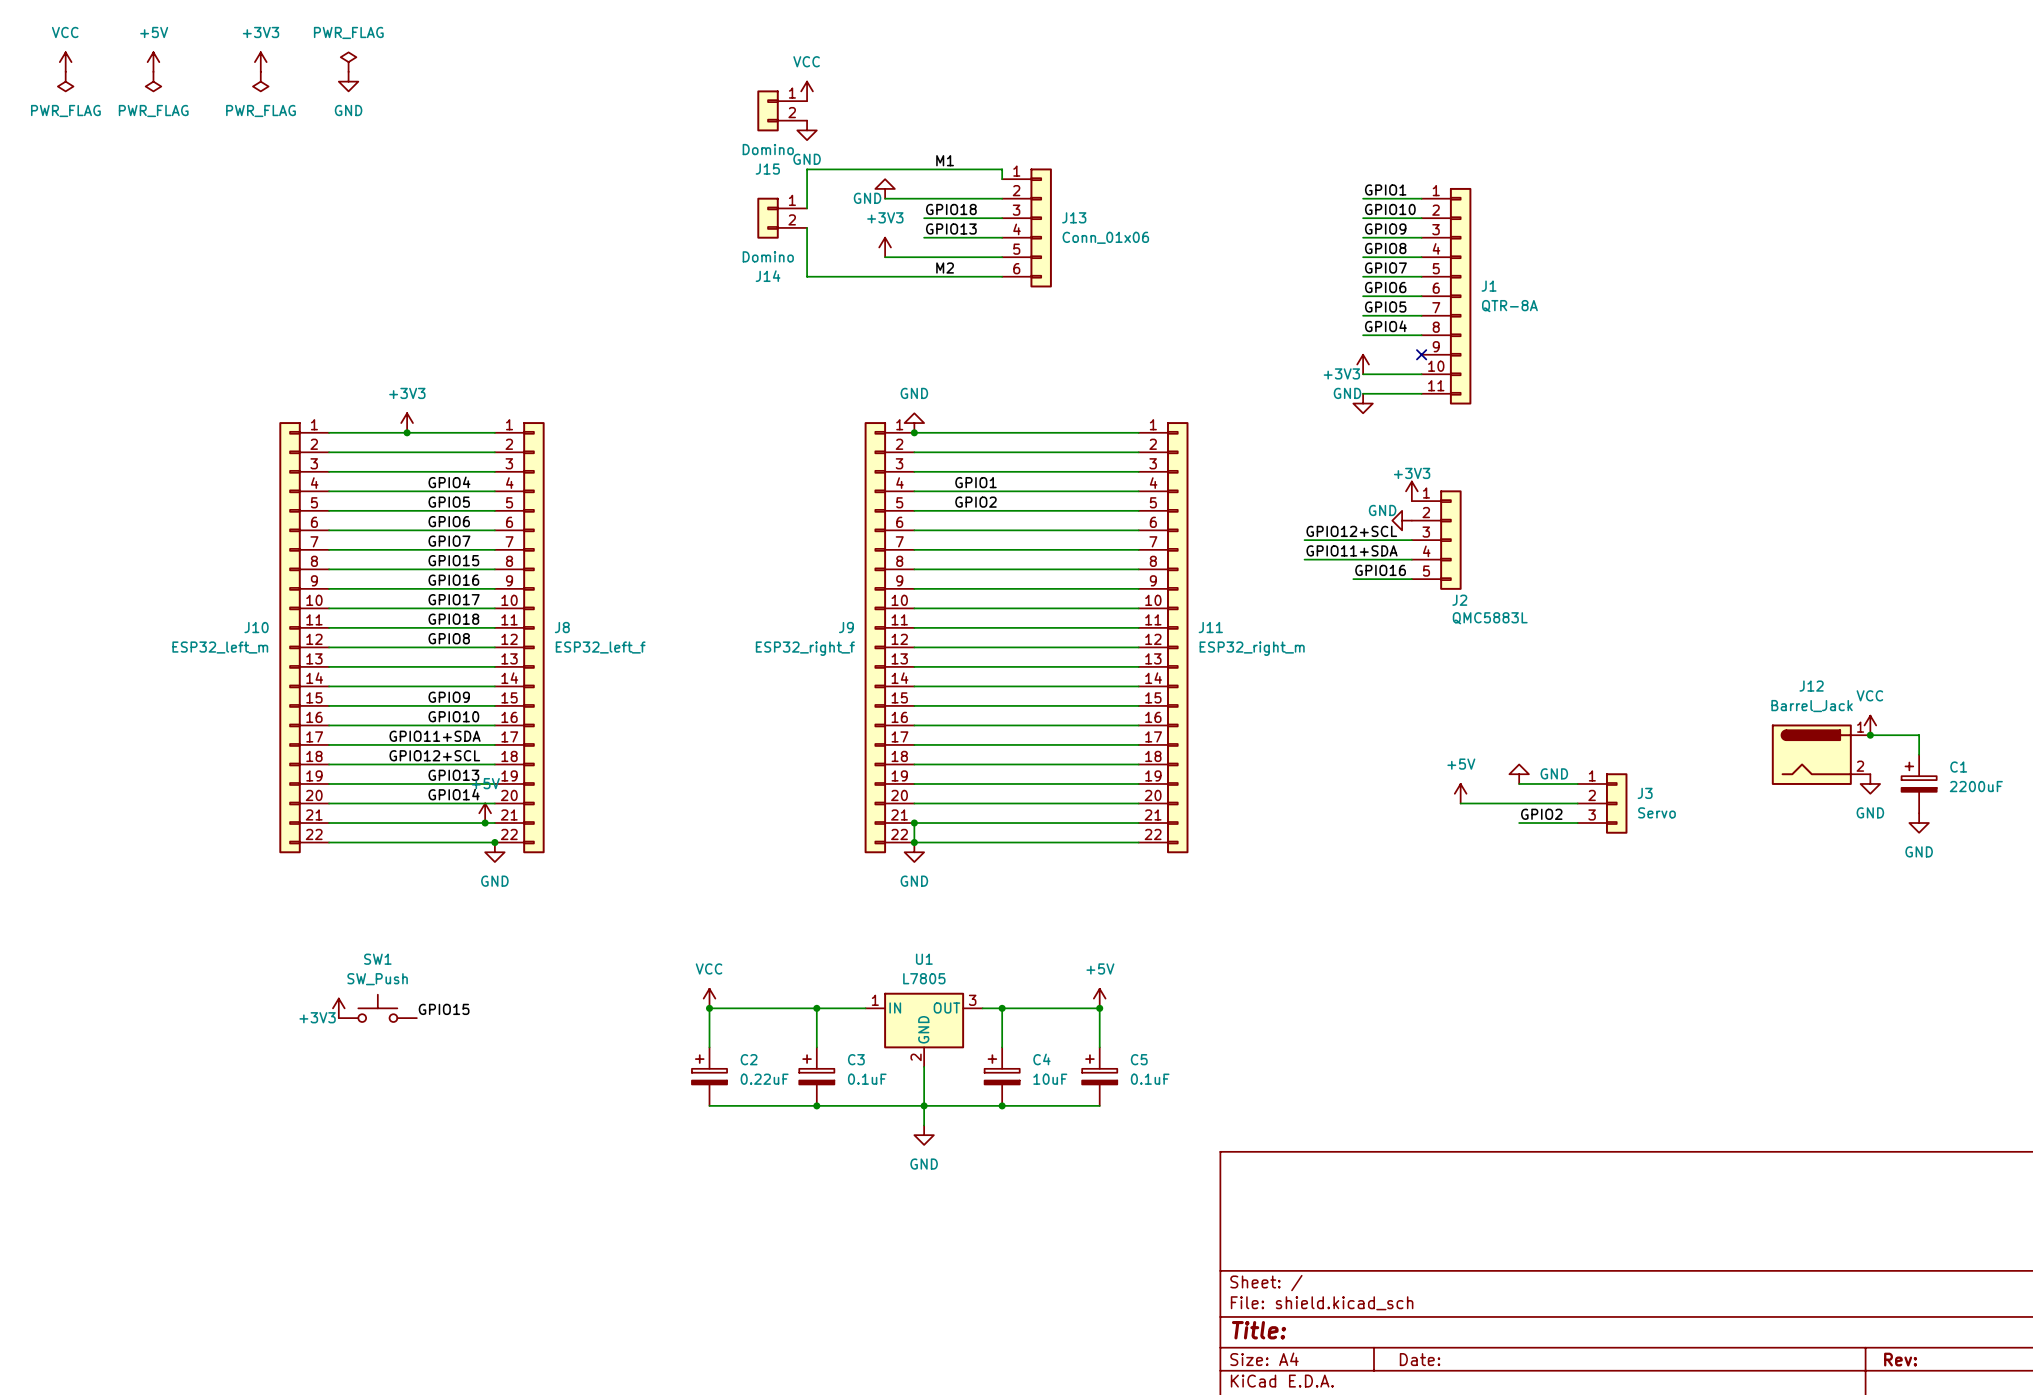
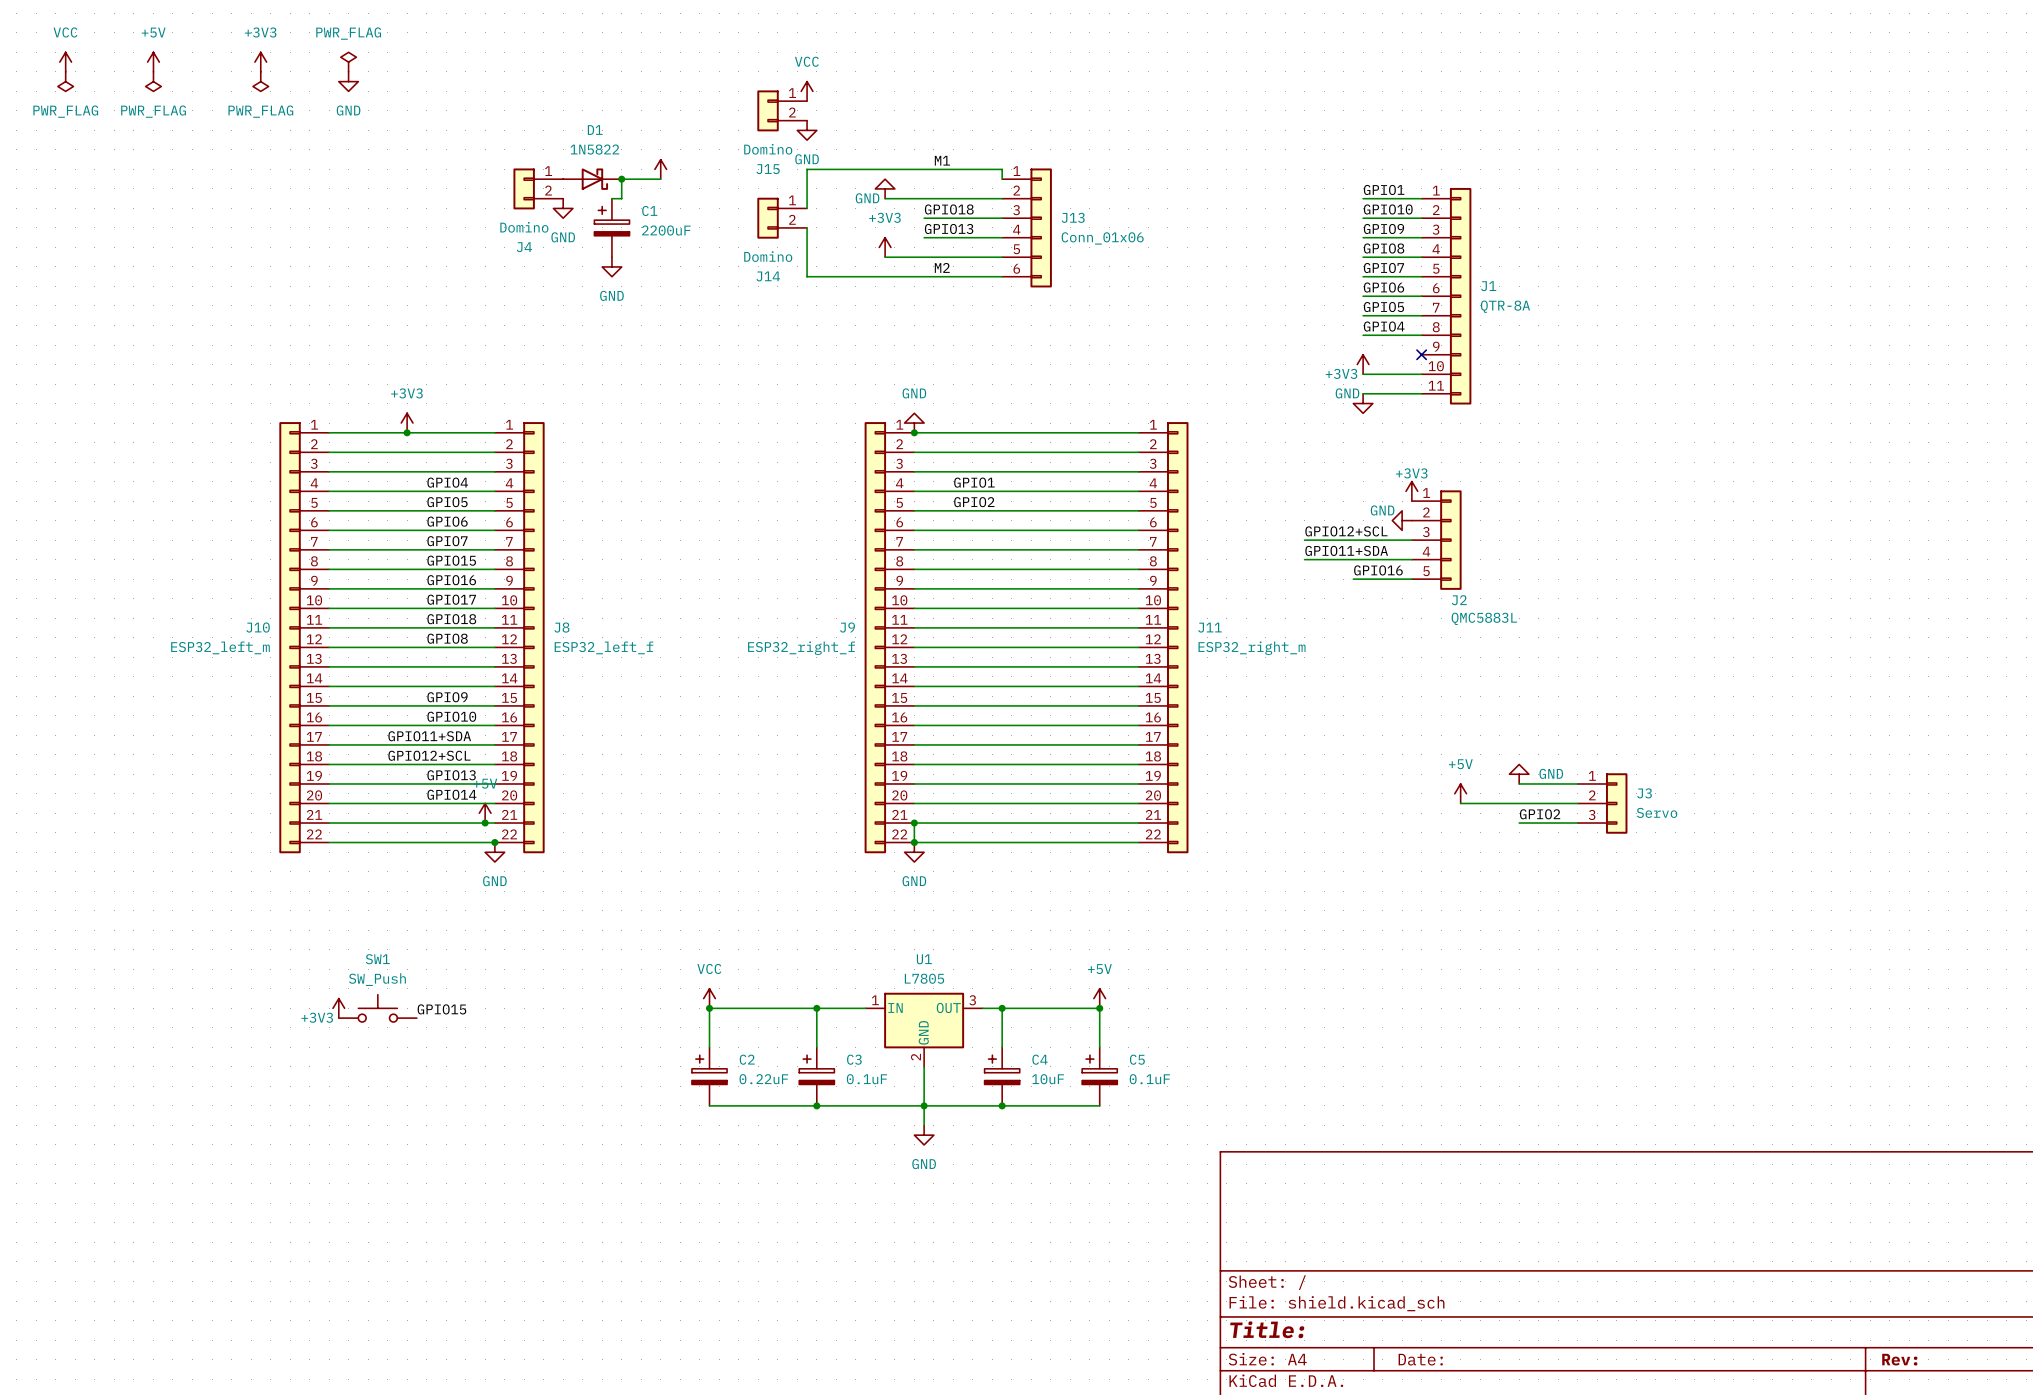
power symbol: none -> (660, 169)
D1: none -> 1N5822 (592, 179)
junction: none -> (621, 179)
wire: none -> (660, 179) (621, 179) (621, 198) (611, 198)
J4: none -> Domino (538, 188)
power symbol: none -> GND (563, 208)
power symbol: none -> GND (611, 266)
power symbol: VCC (1870, 725) -> none
wire: (1870, 735) (1919, 735) (1919, 754) -> none
junction: (1870, 735) -> none
J12: Barrel_Jack (1821, 754) -> none
power symbol: GND (1870, 783) -> none
C1 position: (1919, 783) -> (611, 227)
power symbol: GND (1919, 823) -> none

